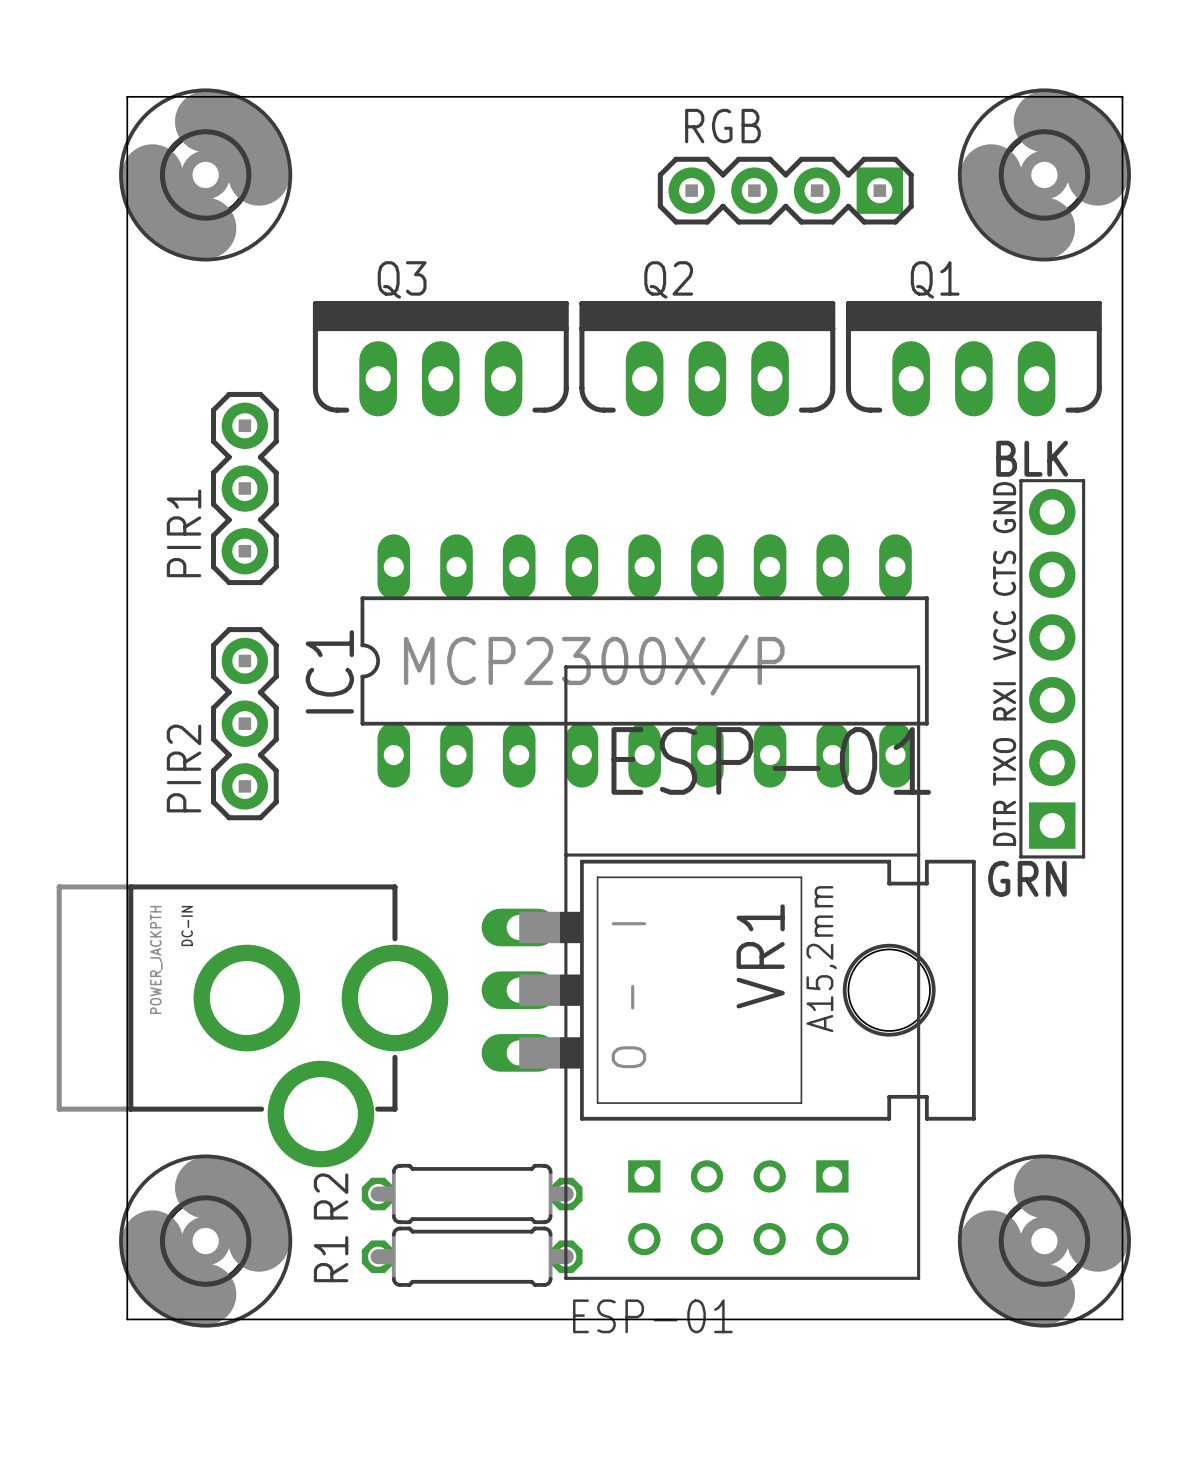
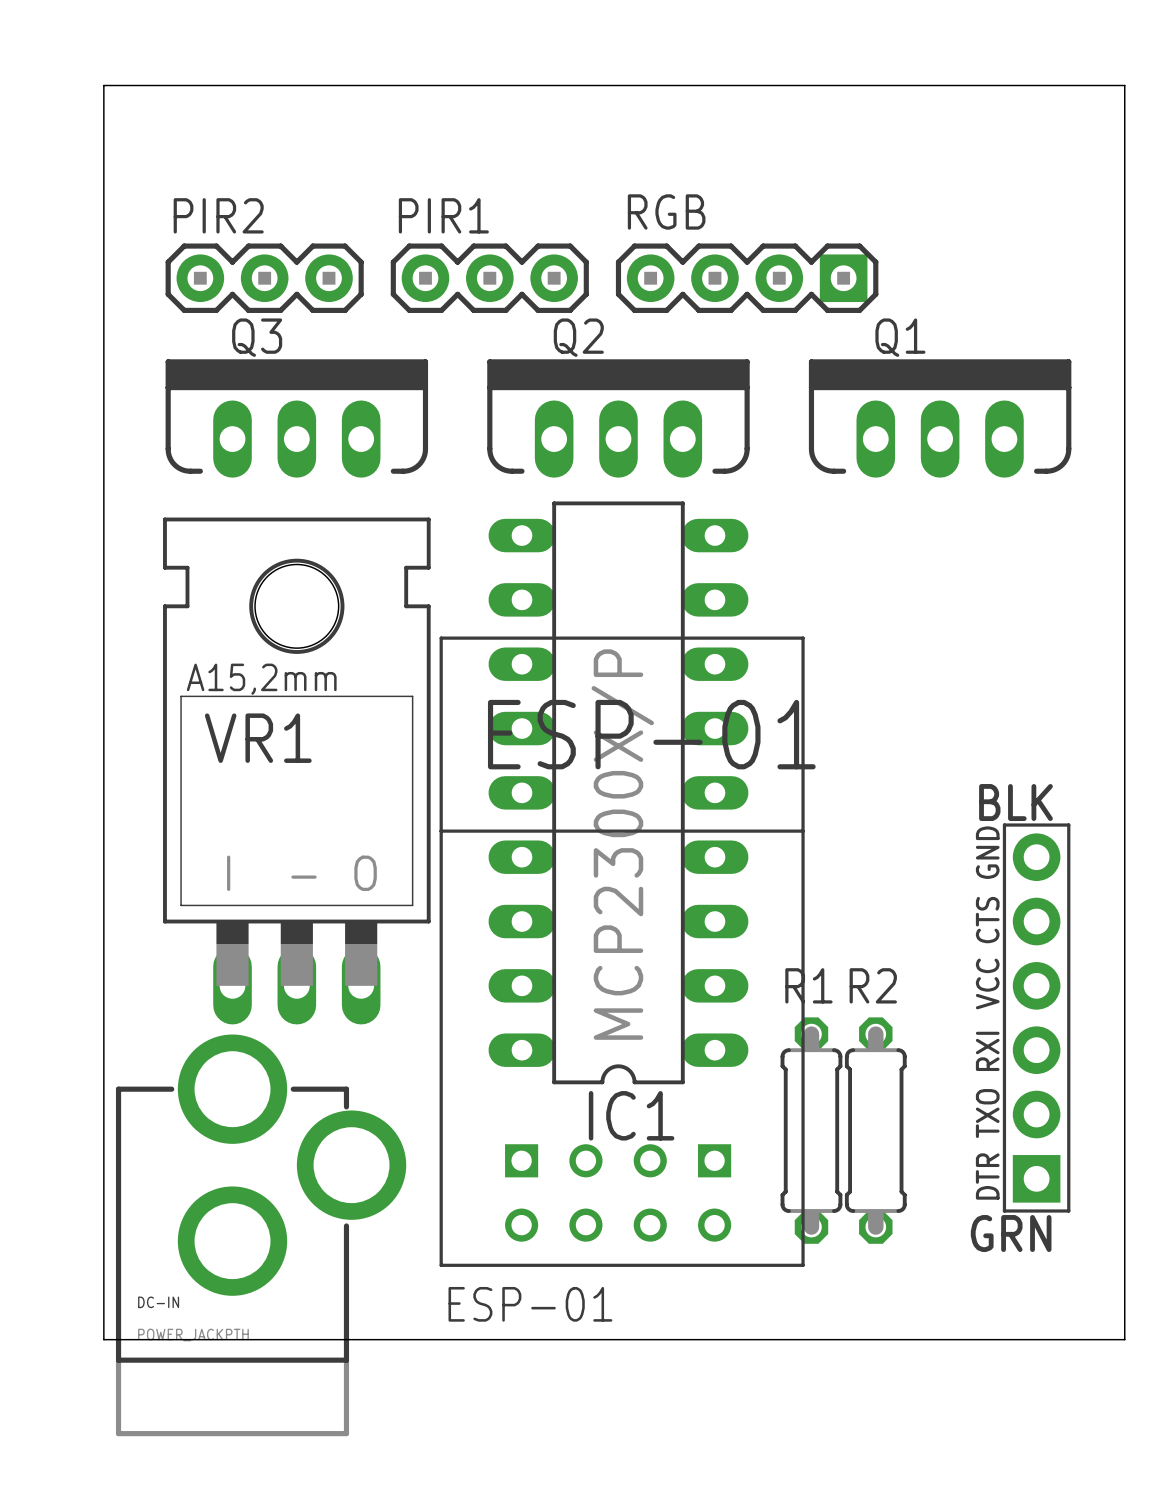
RGB name position: RGB (722, 126) -> RGB (666, 211)
part: (205, 174) -> none
part: (1044, 174) -> none
RGB position: (785, 190) -> (747, 278)
Q3 position: (440, 358) -> (296, 418)
Q2 position: (707, 358) -> (618, 418)
Q1 position: (973, 358) -> (940, 418)
PIR1 rotation: 0° (244, 488) -> 90° clockwise (489, 278)
PIR1 position: (244, 488) -> (489, 278)
IC1 rotation: 0° (644, 660) -> 90° counterclockwise (618, 792)
part position: (1052, 668) -> (1036, 1018)
PIR2 rotation: 0° (244, 723) -> 90° clockwise (264, 278)
PIR2 position: (244, 723) -> (264, 278)
VR1 footprint: [481, 859, 976, 1121] -> [163, 517, 431, 1025]
VR1 name position: VR1 (760, 956) -> VR1 (258, 738)
ESP-01 position: (742, 972) -> (622, 951)
DC-IN rotation: 0° (252, 1025) -> 90° counterclockwise (261, 1235)
R2 rotation: 0° (472, 1194) -> 90° clockwise (875, 1130)
R2 position: (472, 1194) -> (875, 1130)
part: (205, 1241) -> none
part: (1044, 1241) -> none
R1 rotation: 0° (472, 1256) -> 90° clockwise (811, 1130)
R1 position: (472, 1256) -> (811, 1130)

